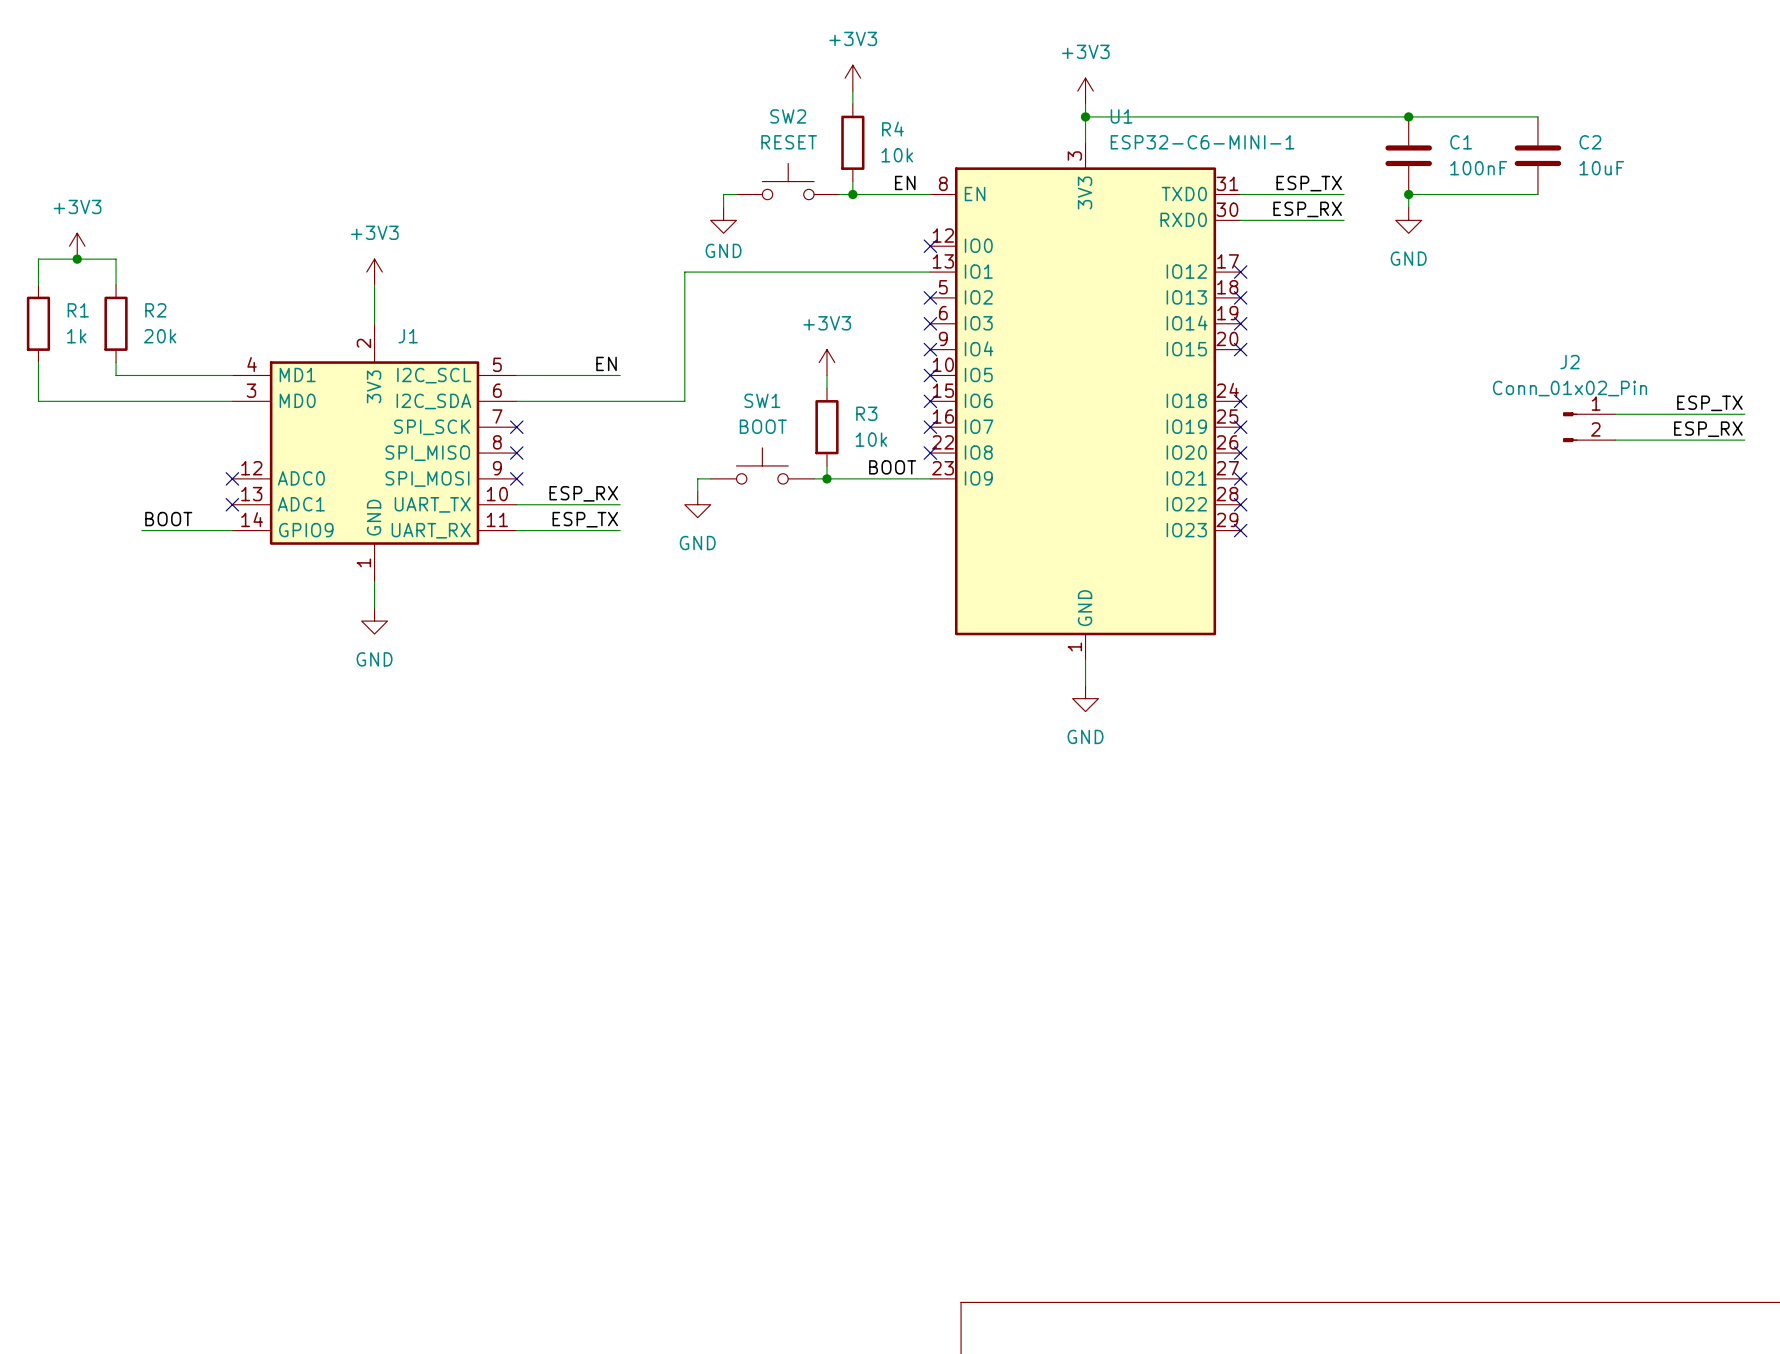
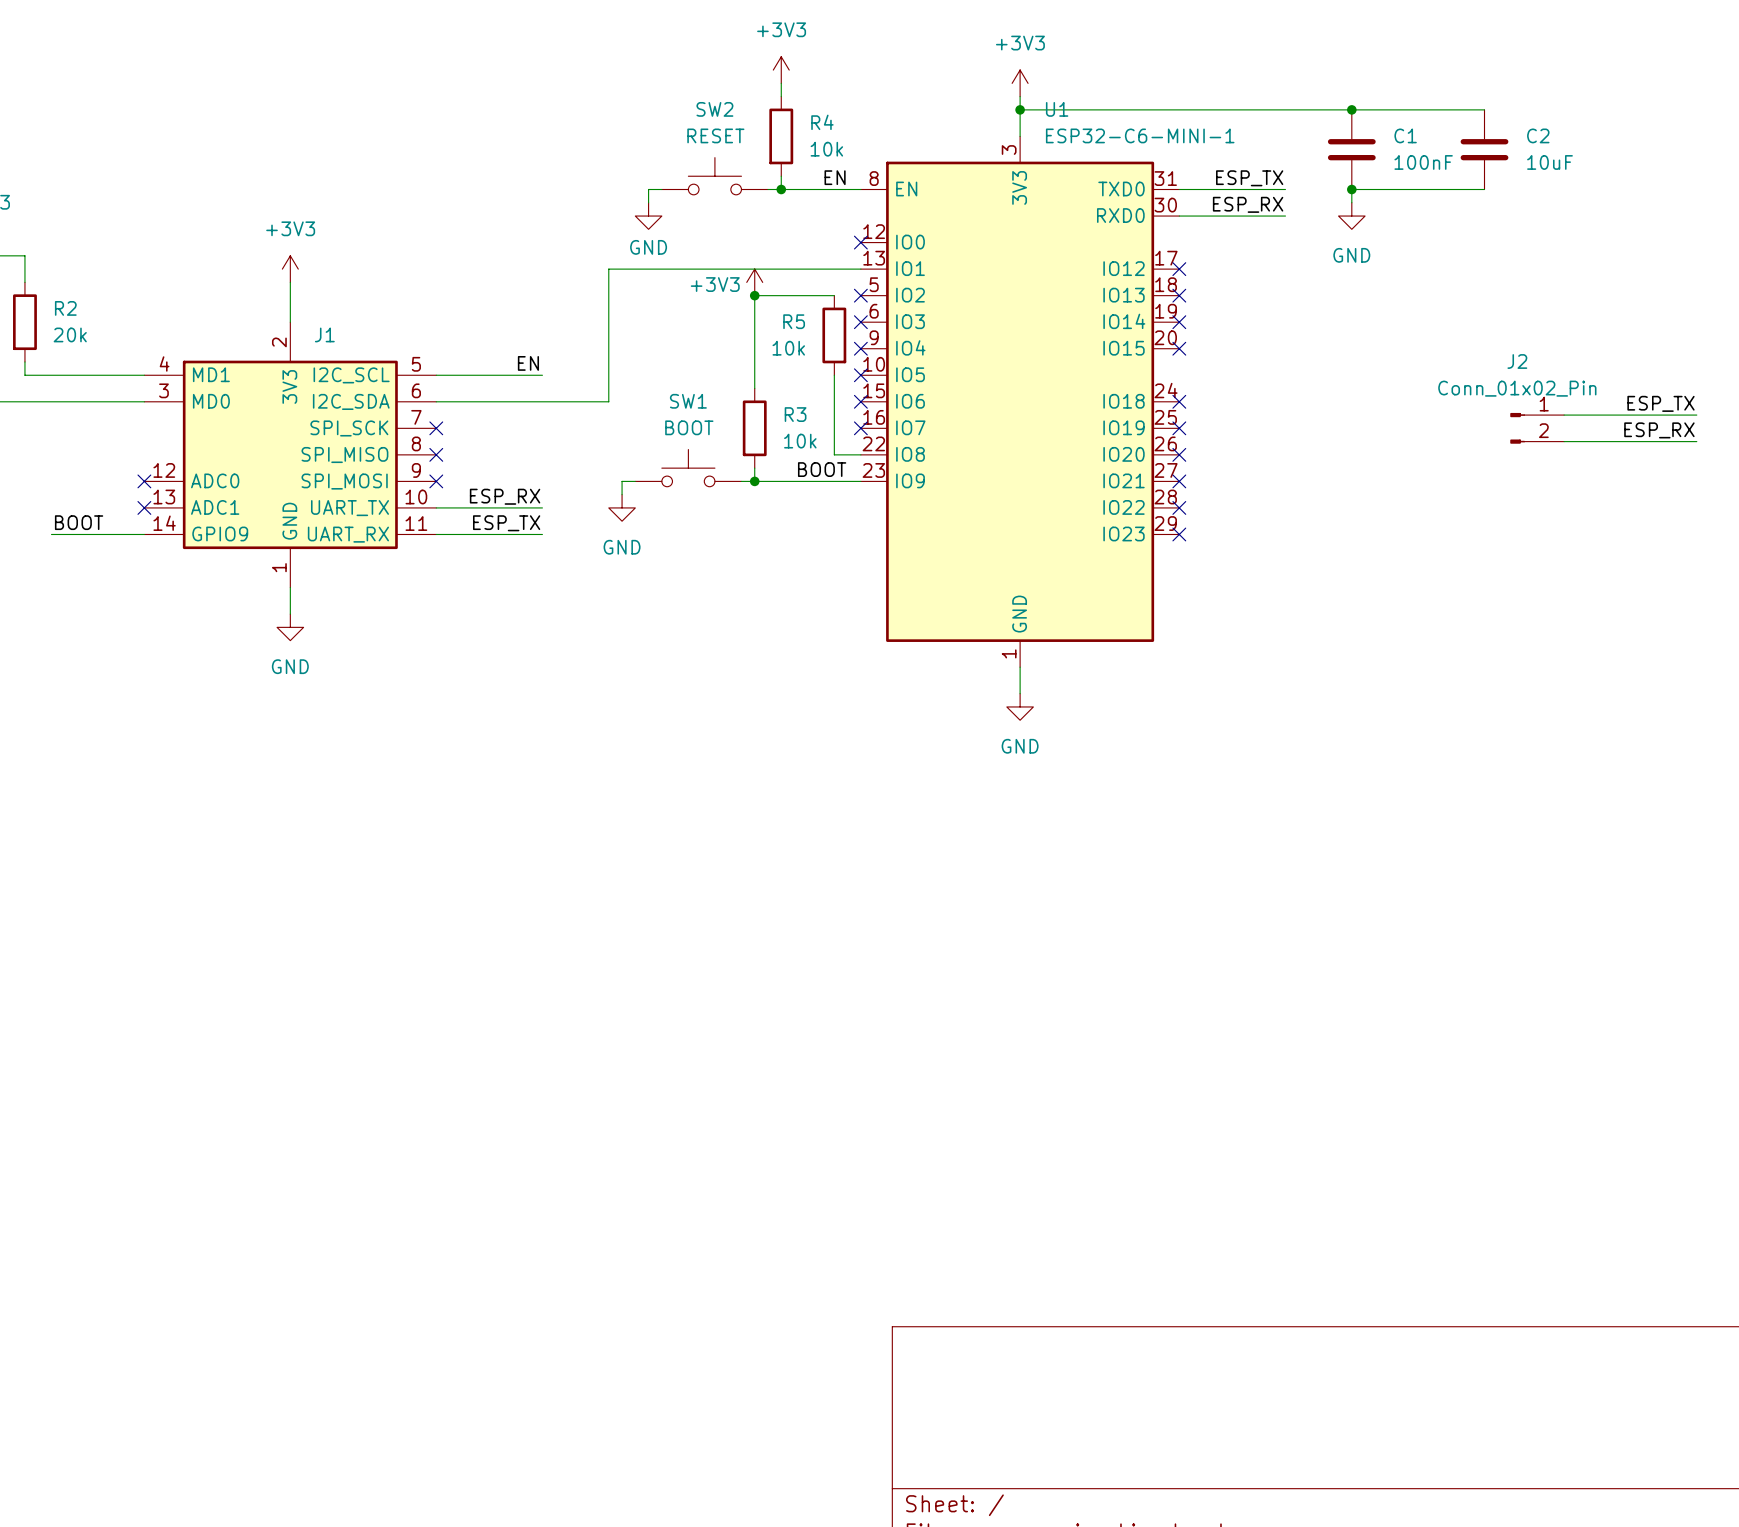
junction: none -> (754, 295)
wire: none -> (834, 295) (754, 295) (754, 375)
power symbol text position: +3V3 (827, 323) -> +3V3 (715, 284)
R5: none -> 10k (834, 335)
power symbol position: +3V3 (826, 362) -> +3V3 (754, 282)
wire: none -> (834, 375) (834, 454) (860, 454)
no-connect mark: (930, 453) -> none

